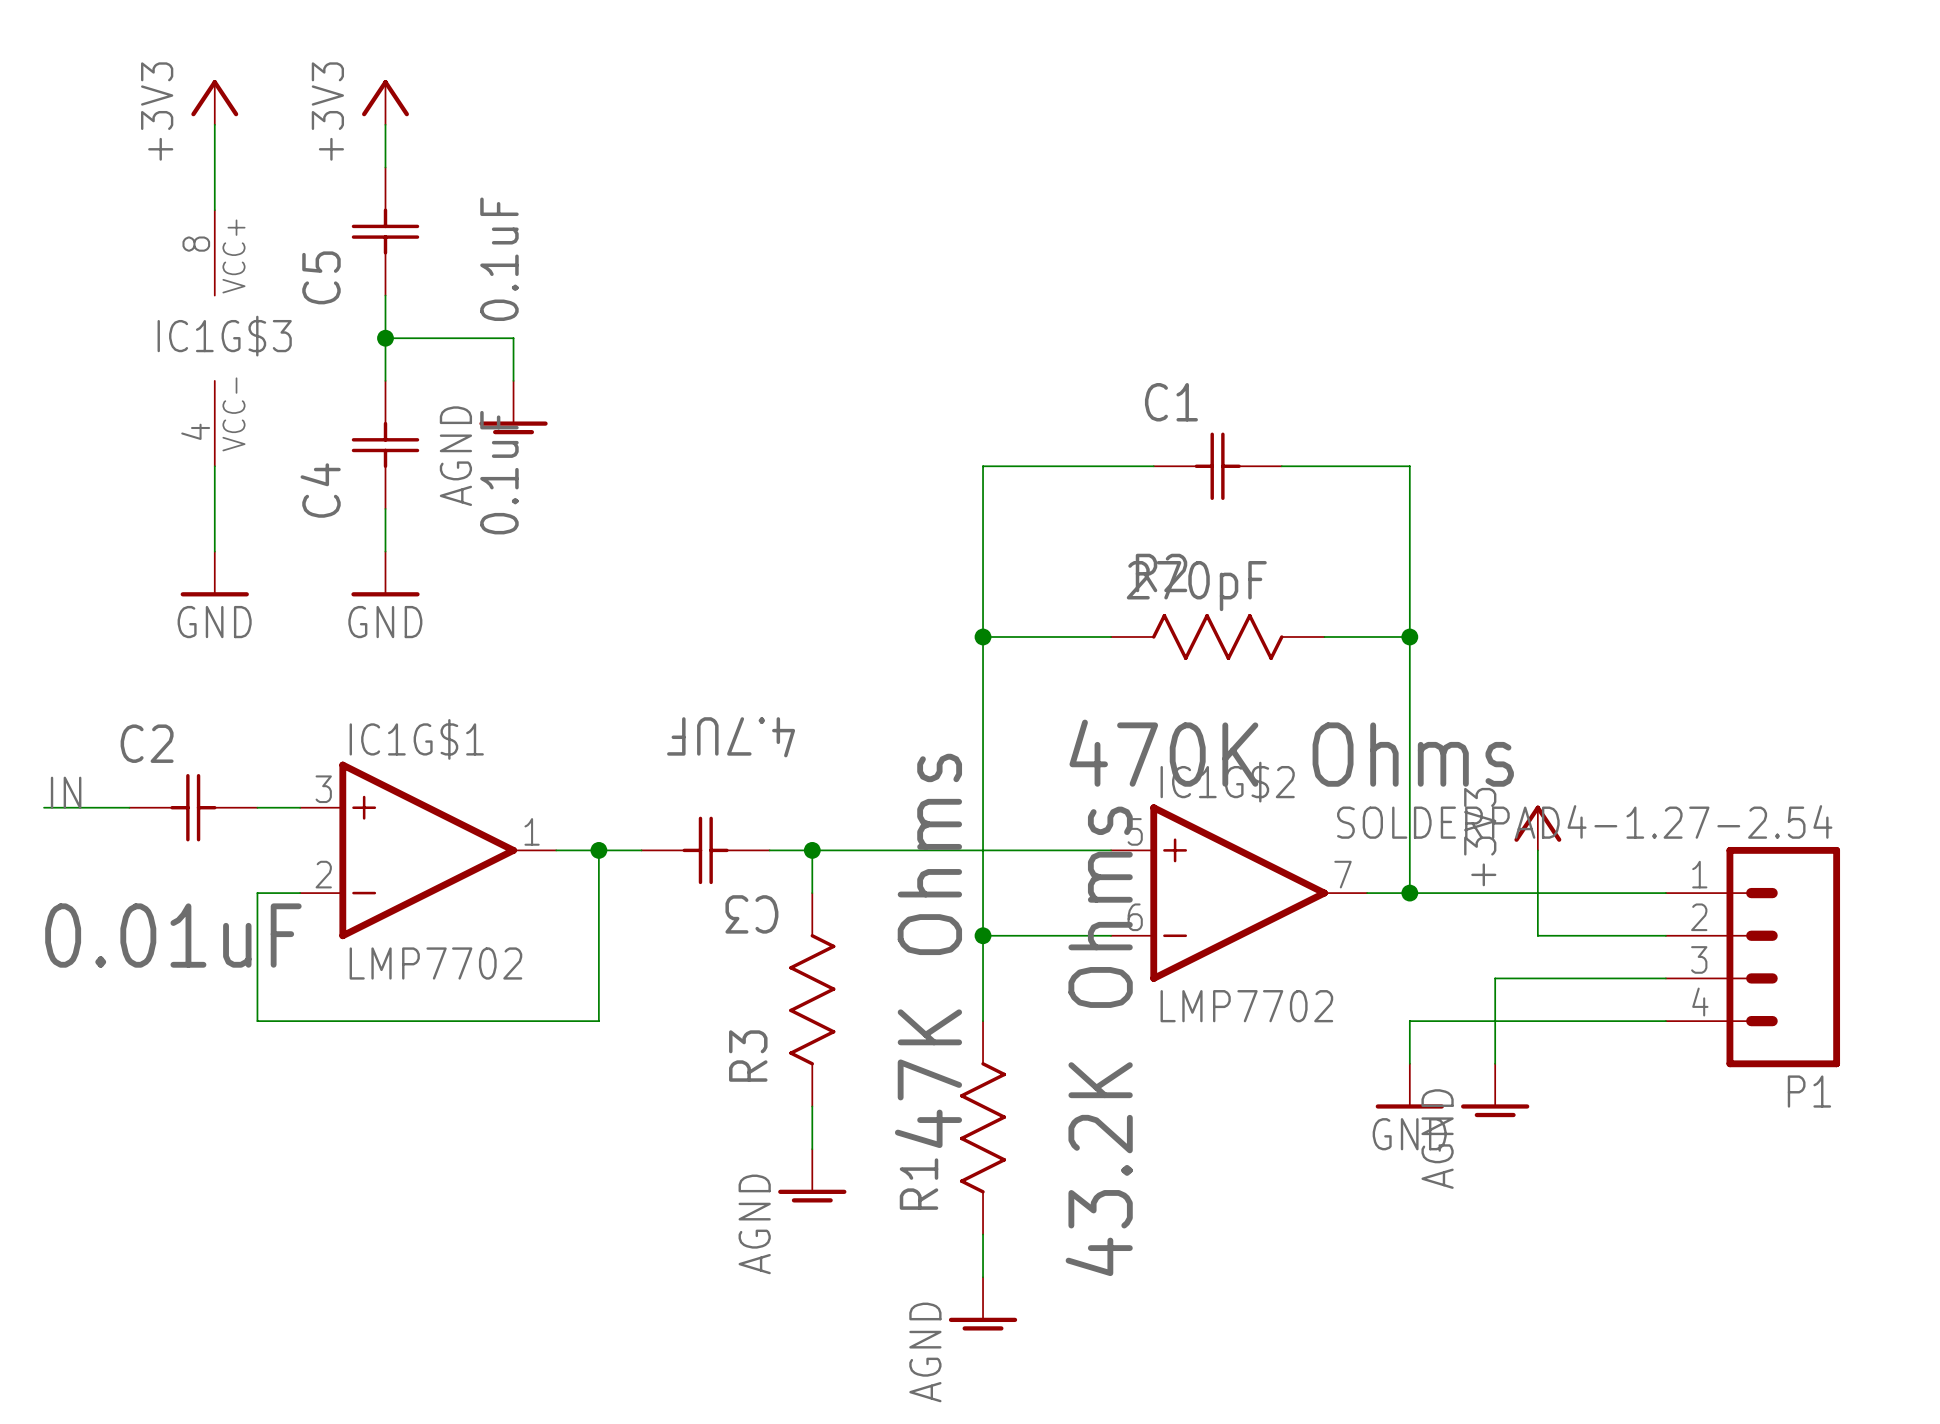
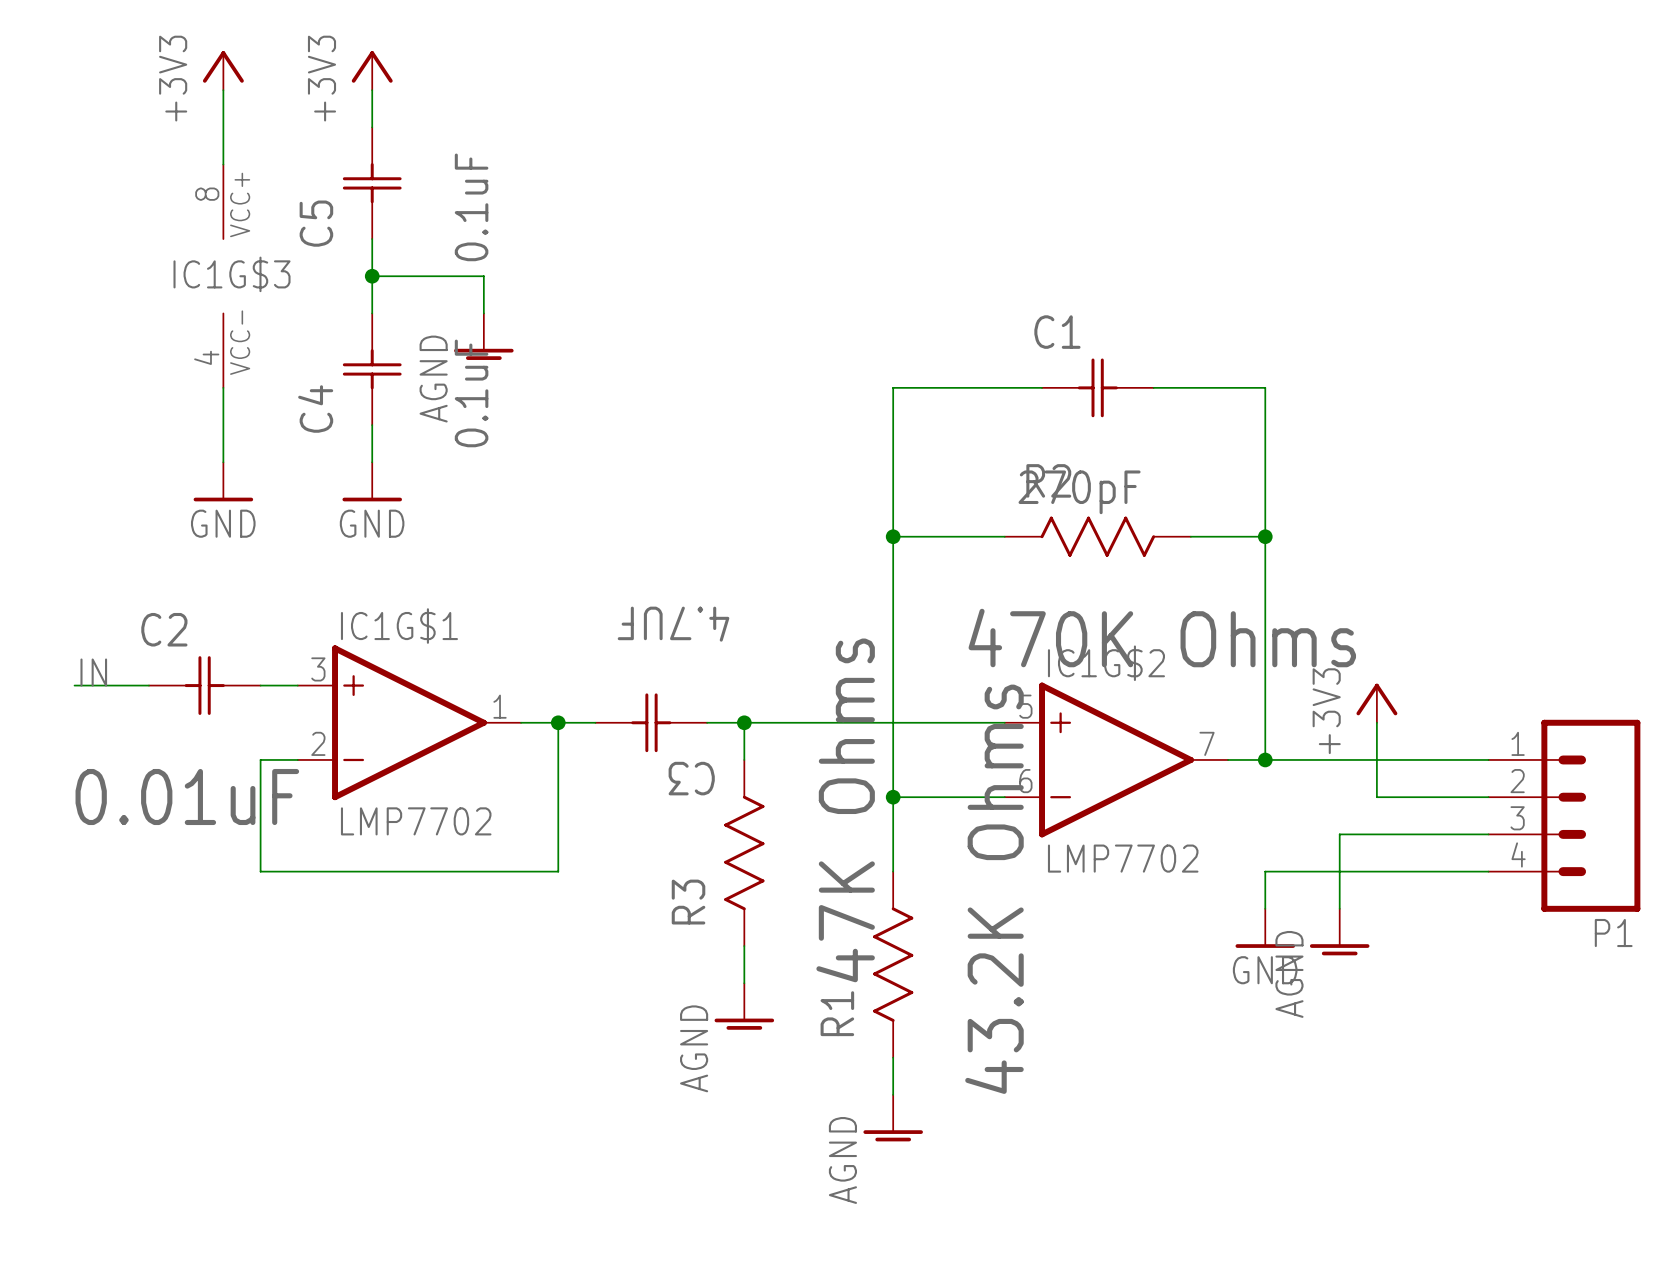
P1 value: SOLDERPAD4-1.27-2.54 (1584, 821) -> none

